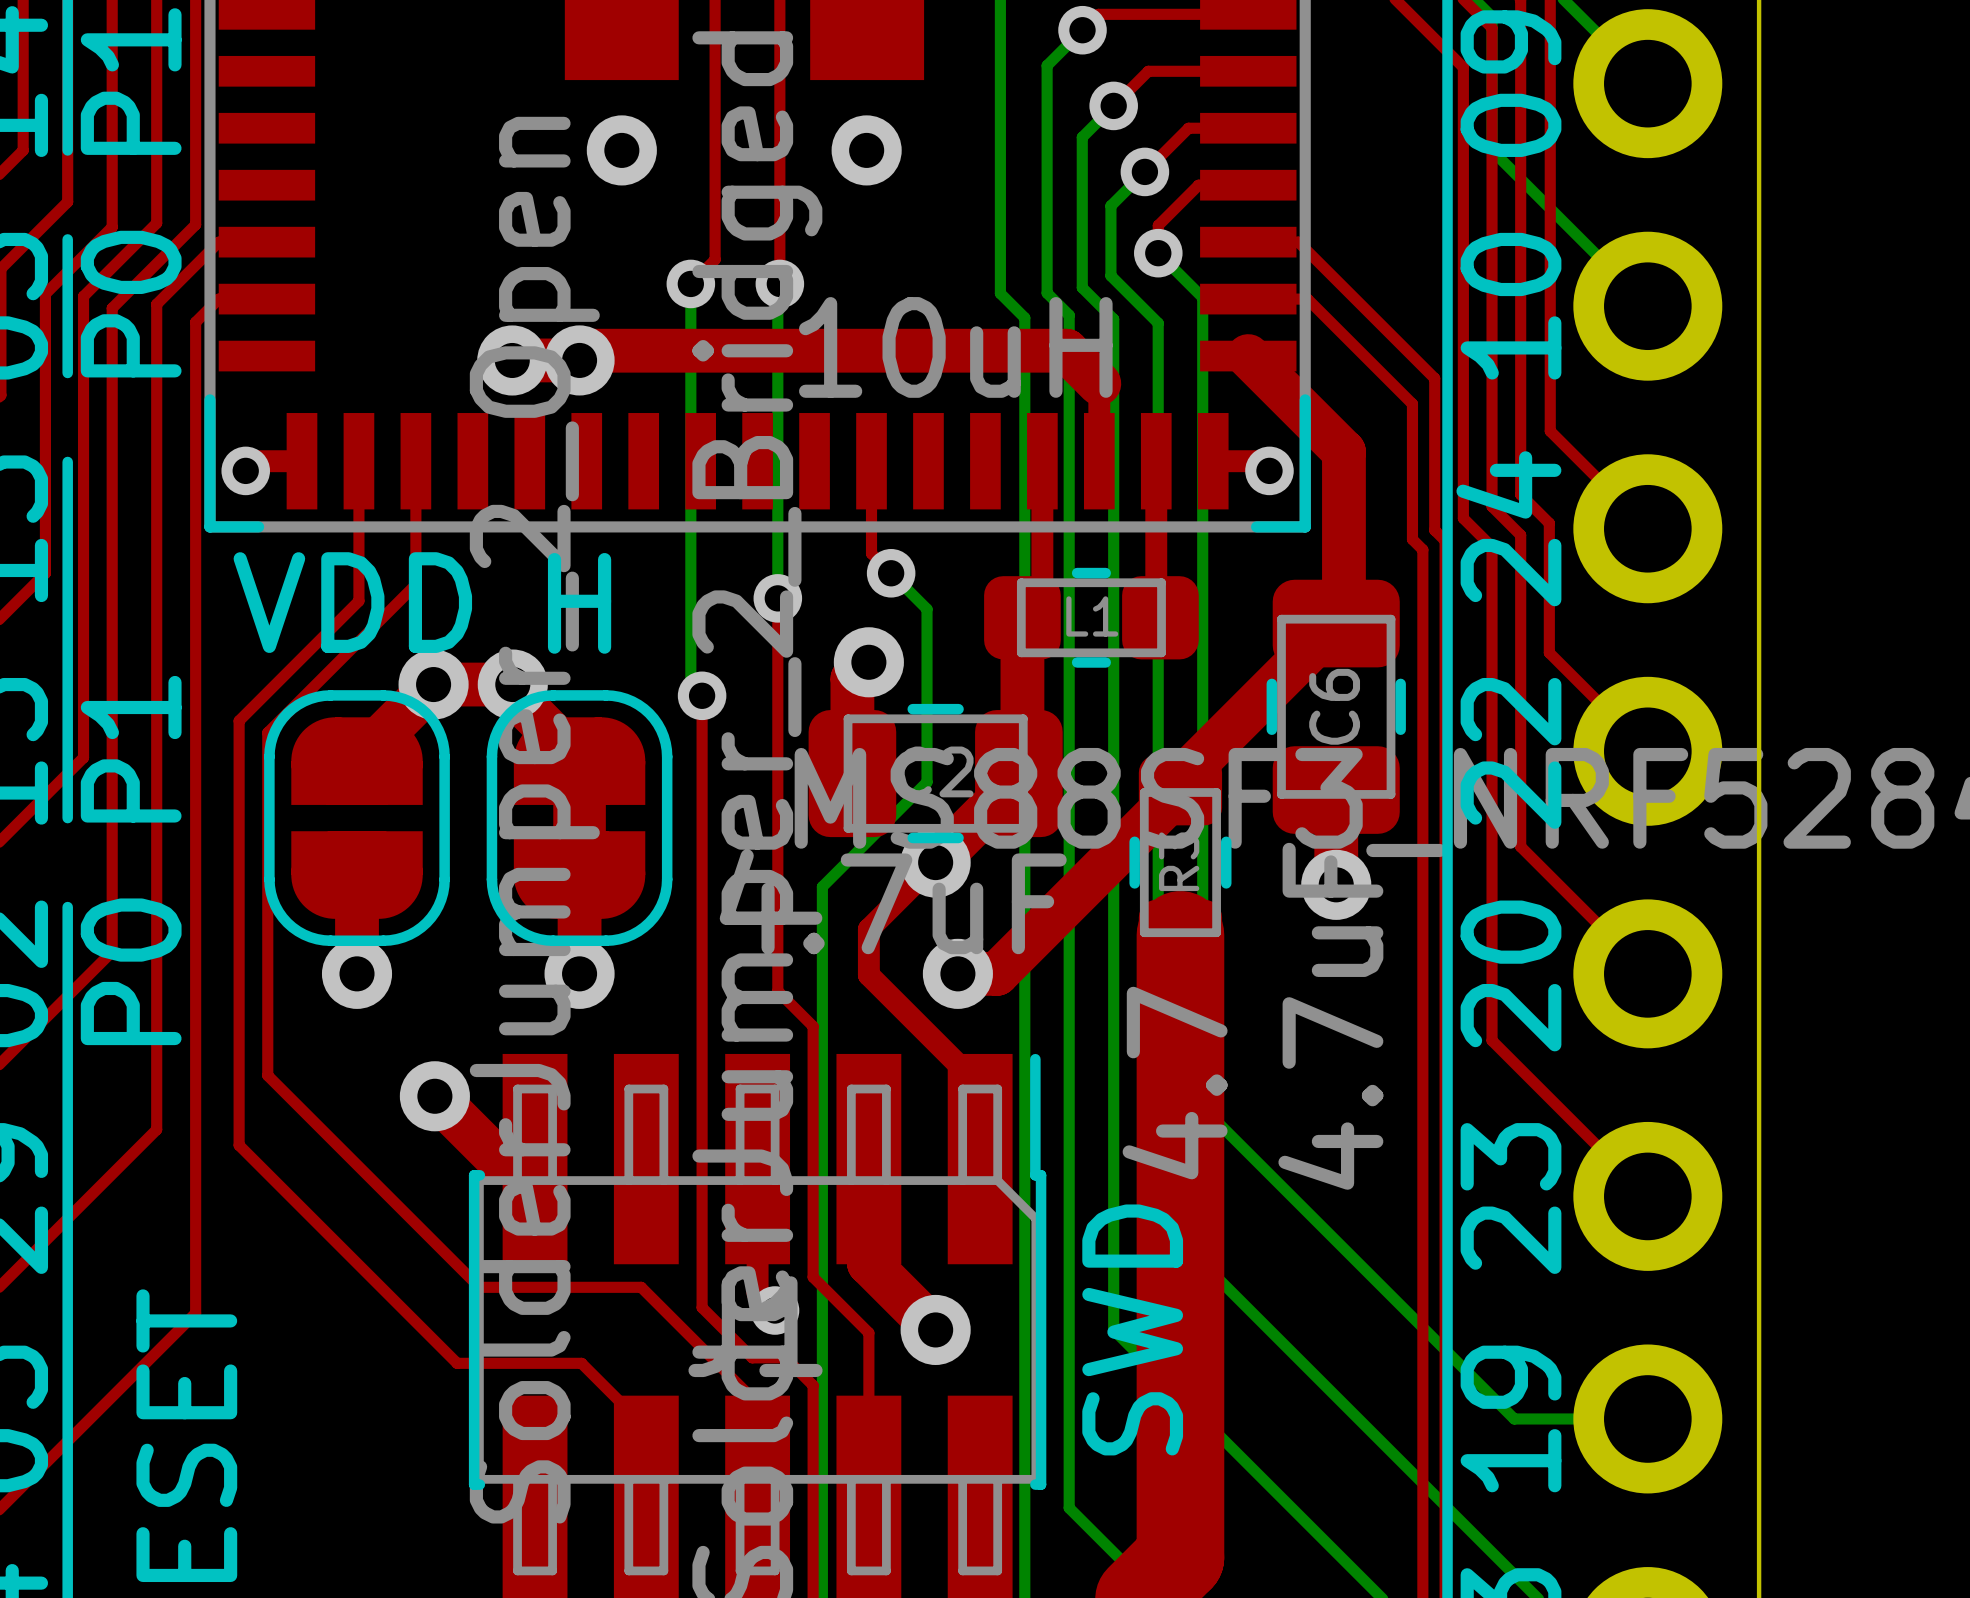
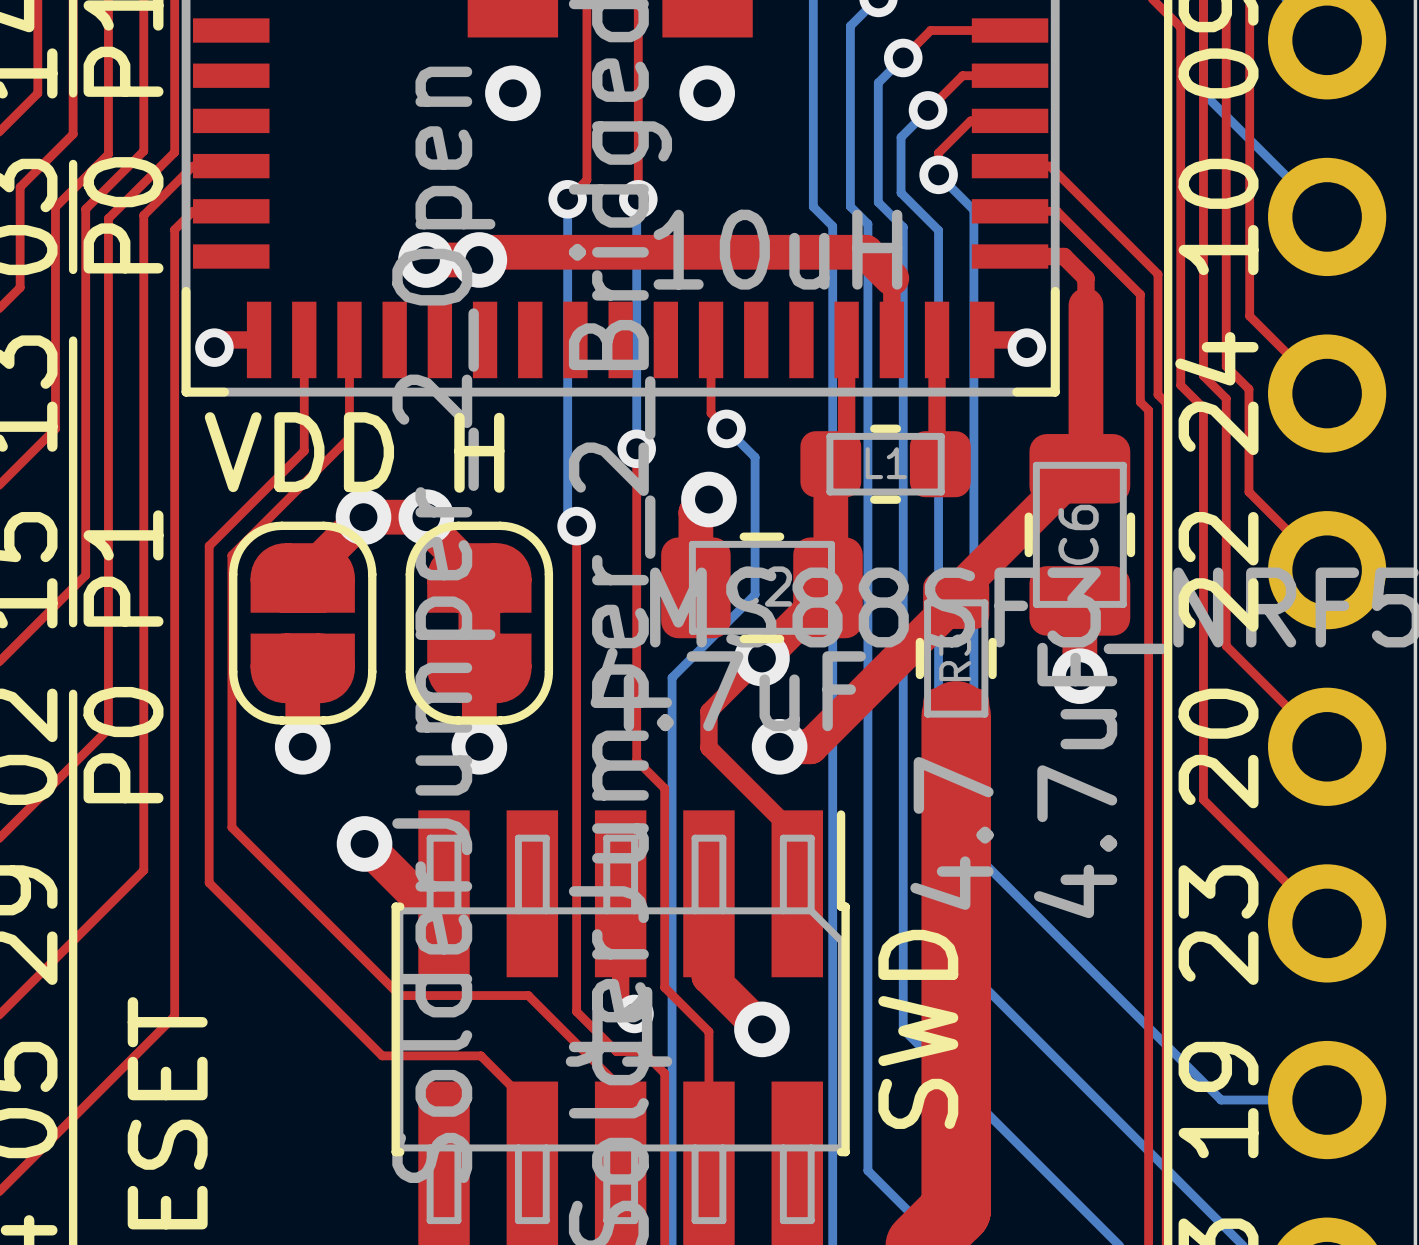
top track: (1248, 356) (1343, 451) -> (1010, 256) (1064, 256) (1085, 278) (1085, 332)

